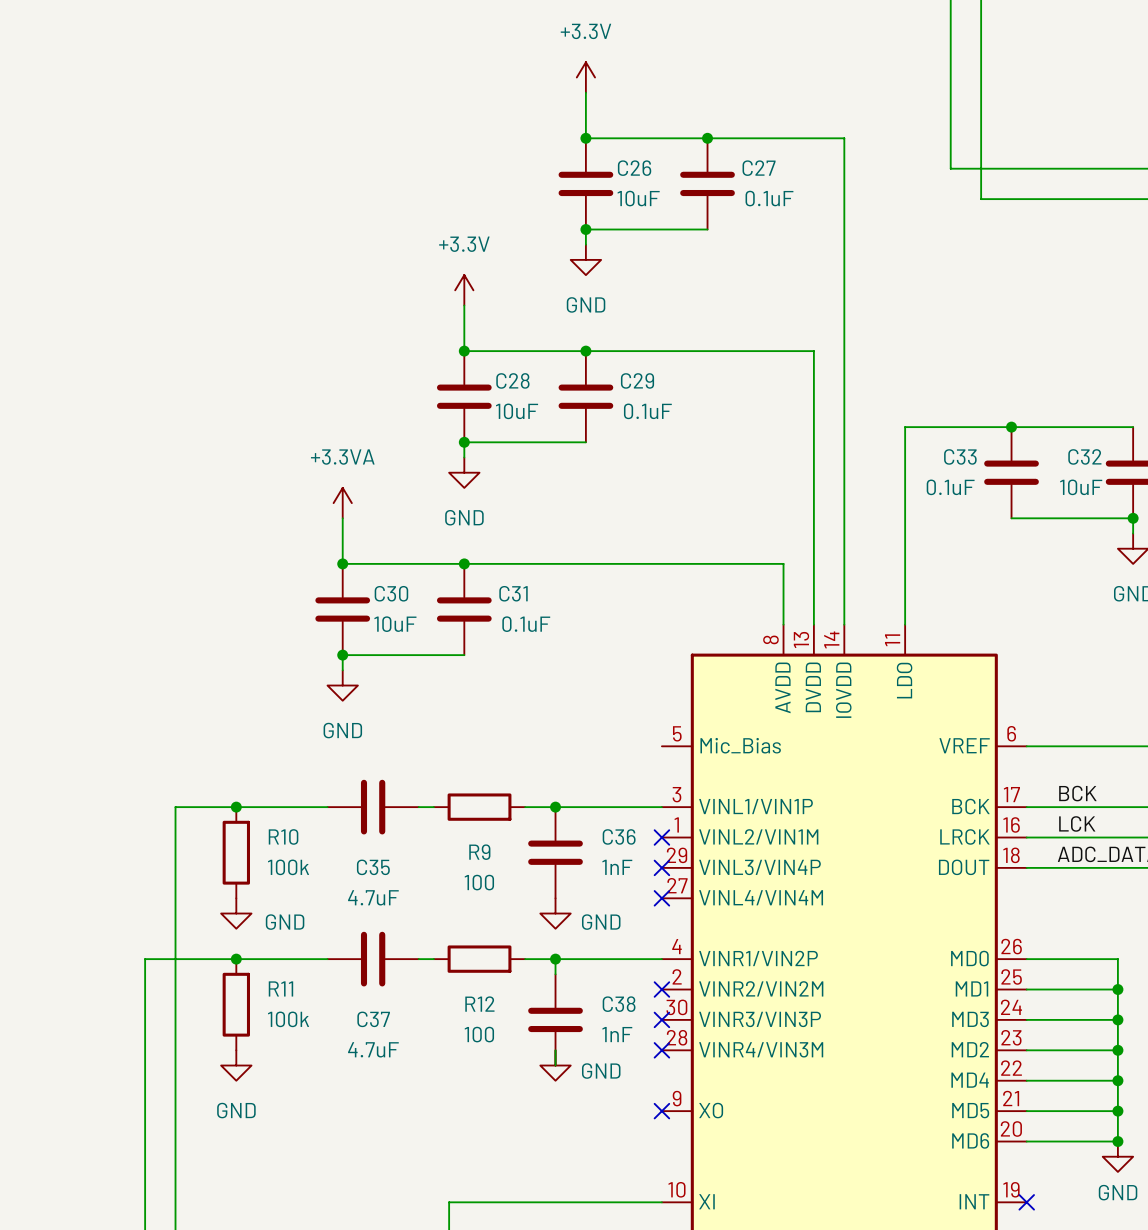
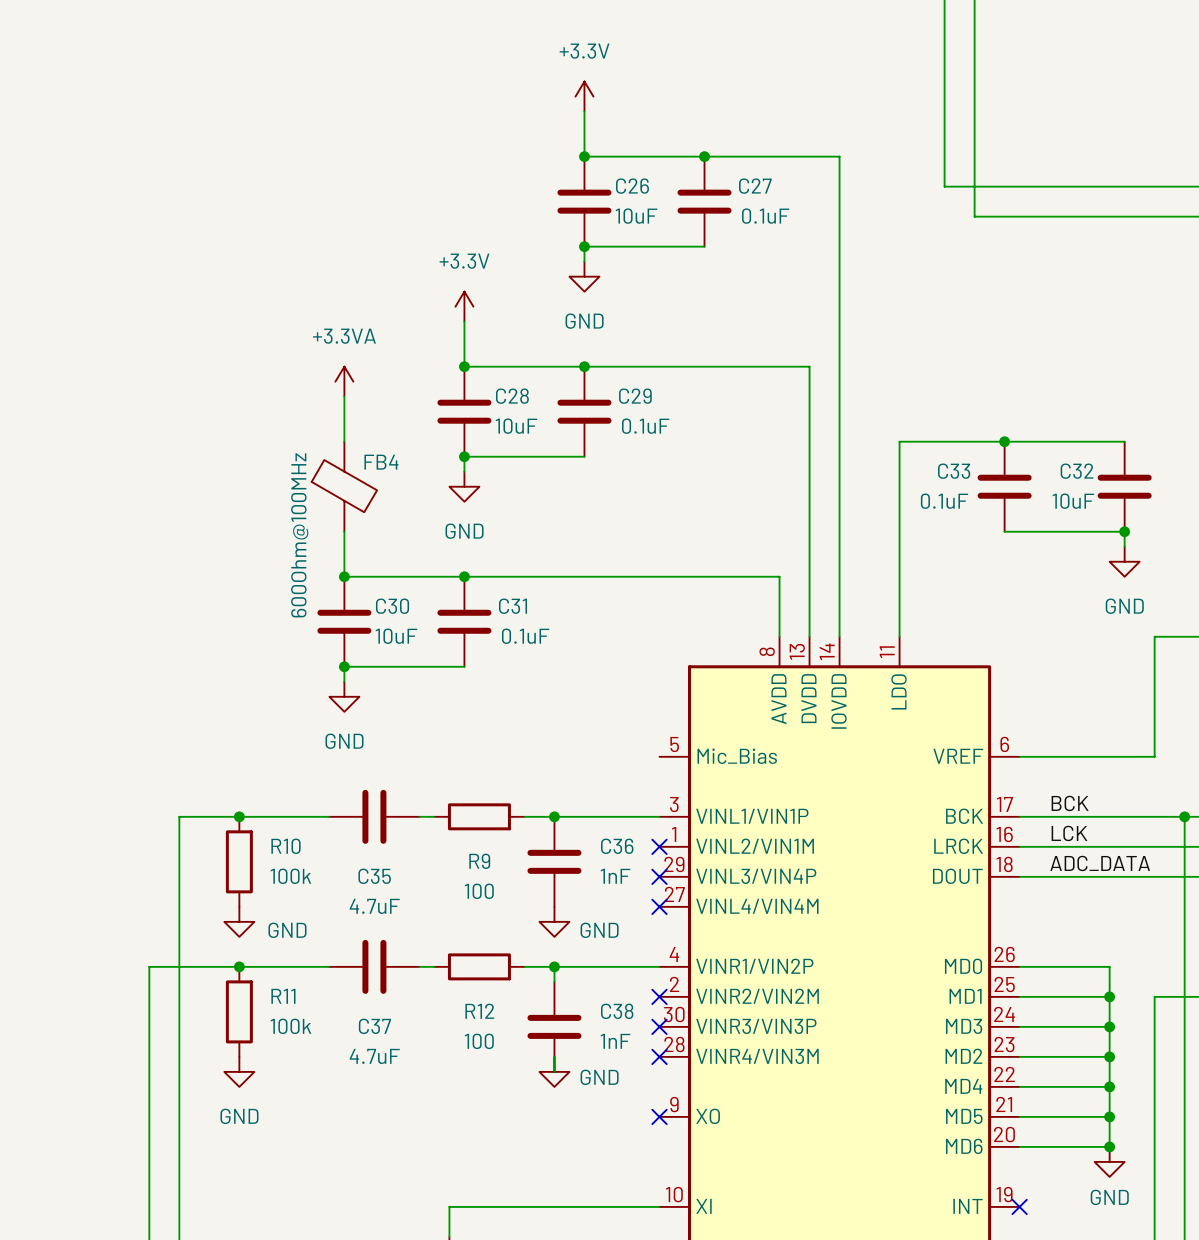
wire: none -> (344, 396) (344, 441)
FB4: none -> 600Ohm@100MHz (344, 486)
power symbol position: +3.3VA (342, 503) -> +3.3VA (344, 381)

